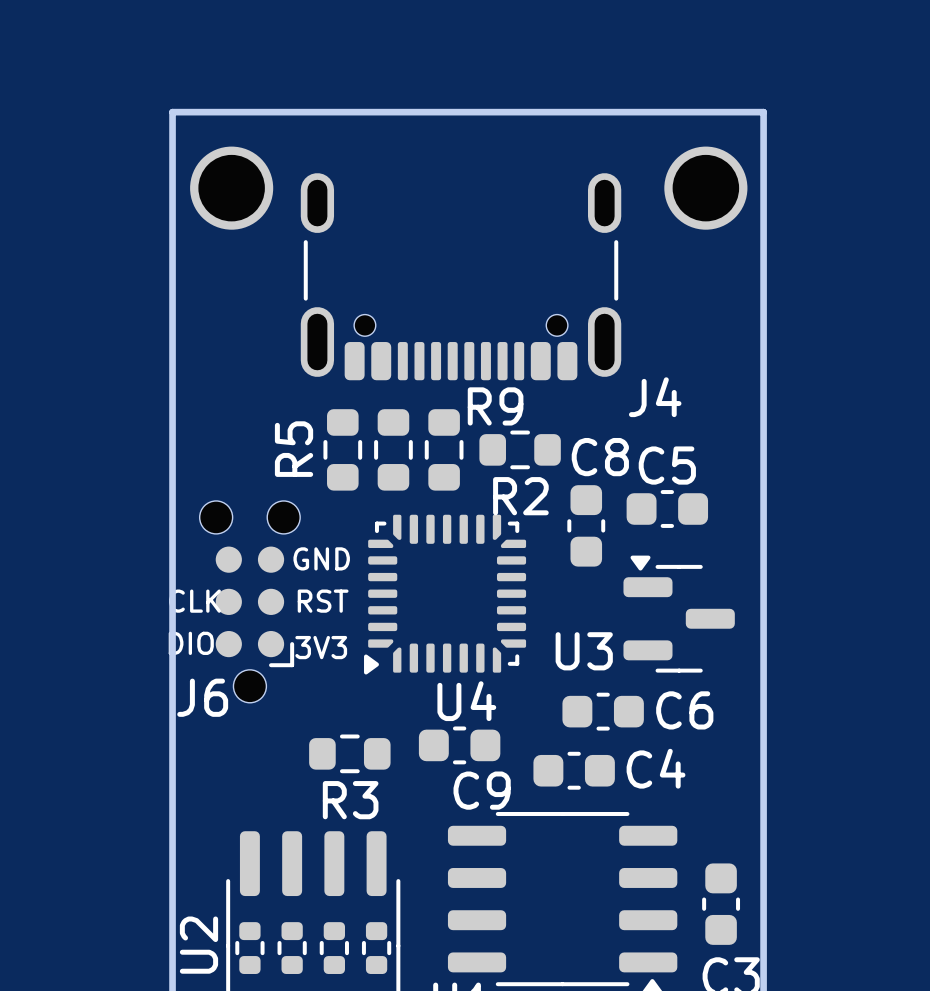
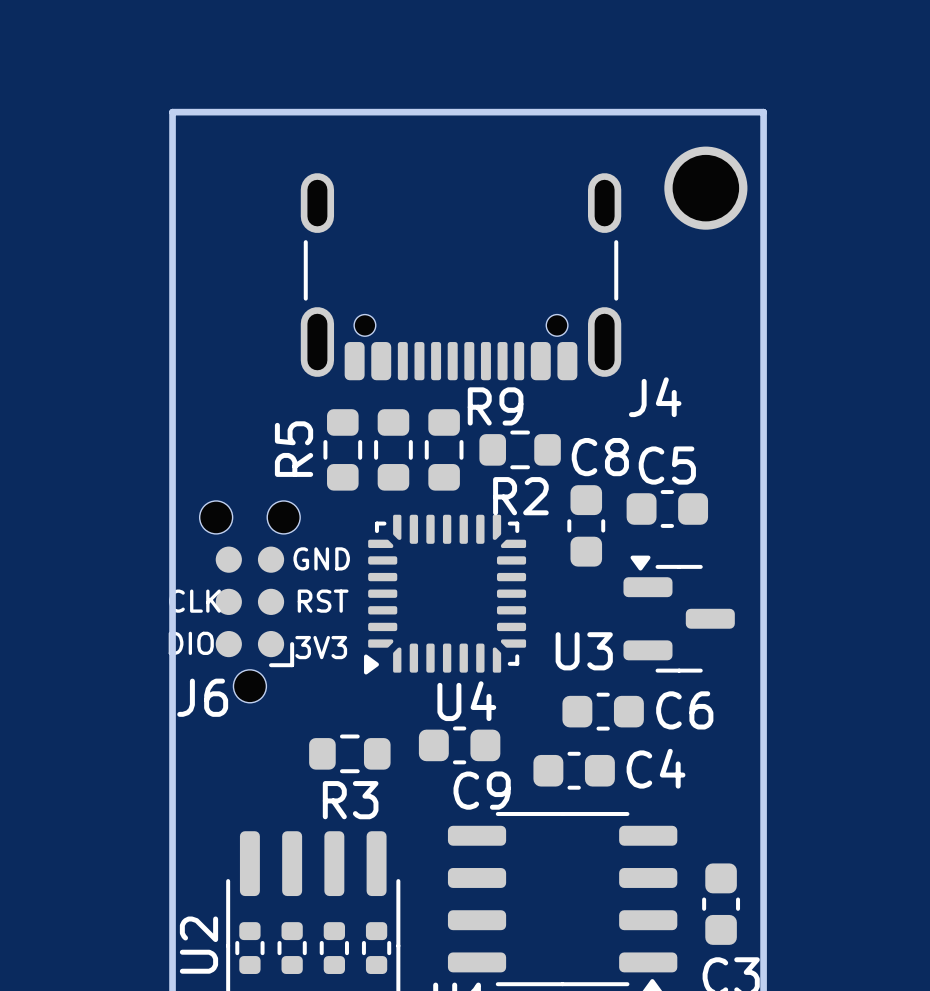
part: (231, 188) -> none

